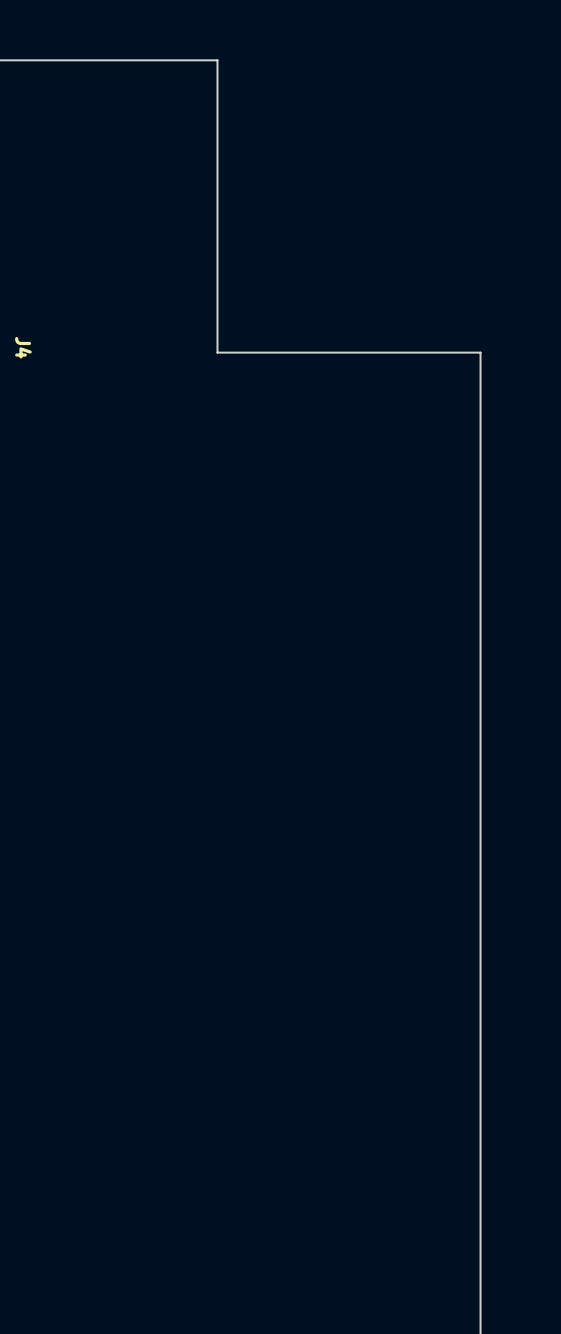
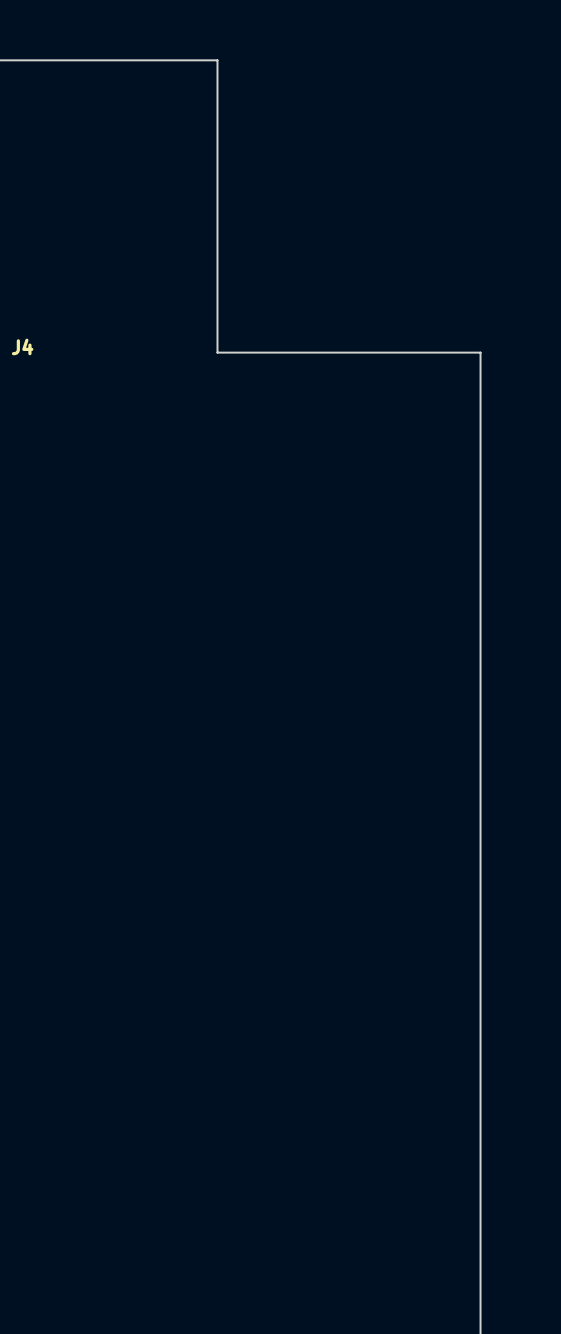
J4 name rotation: 0° (23, 347) -> 90° counterclockwise (22, 346)

